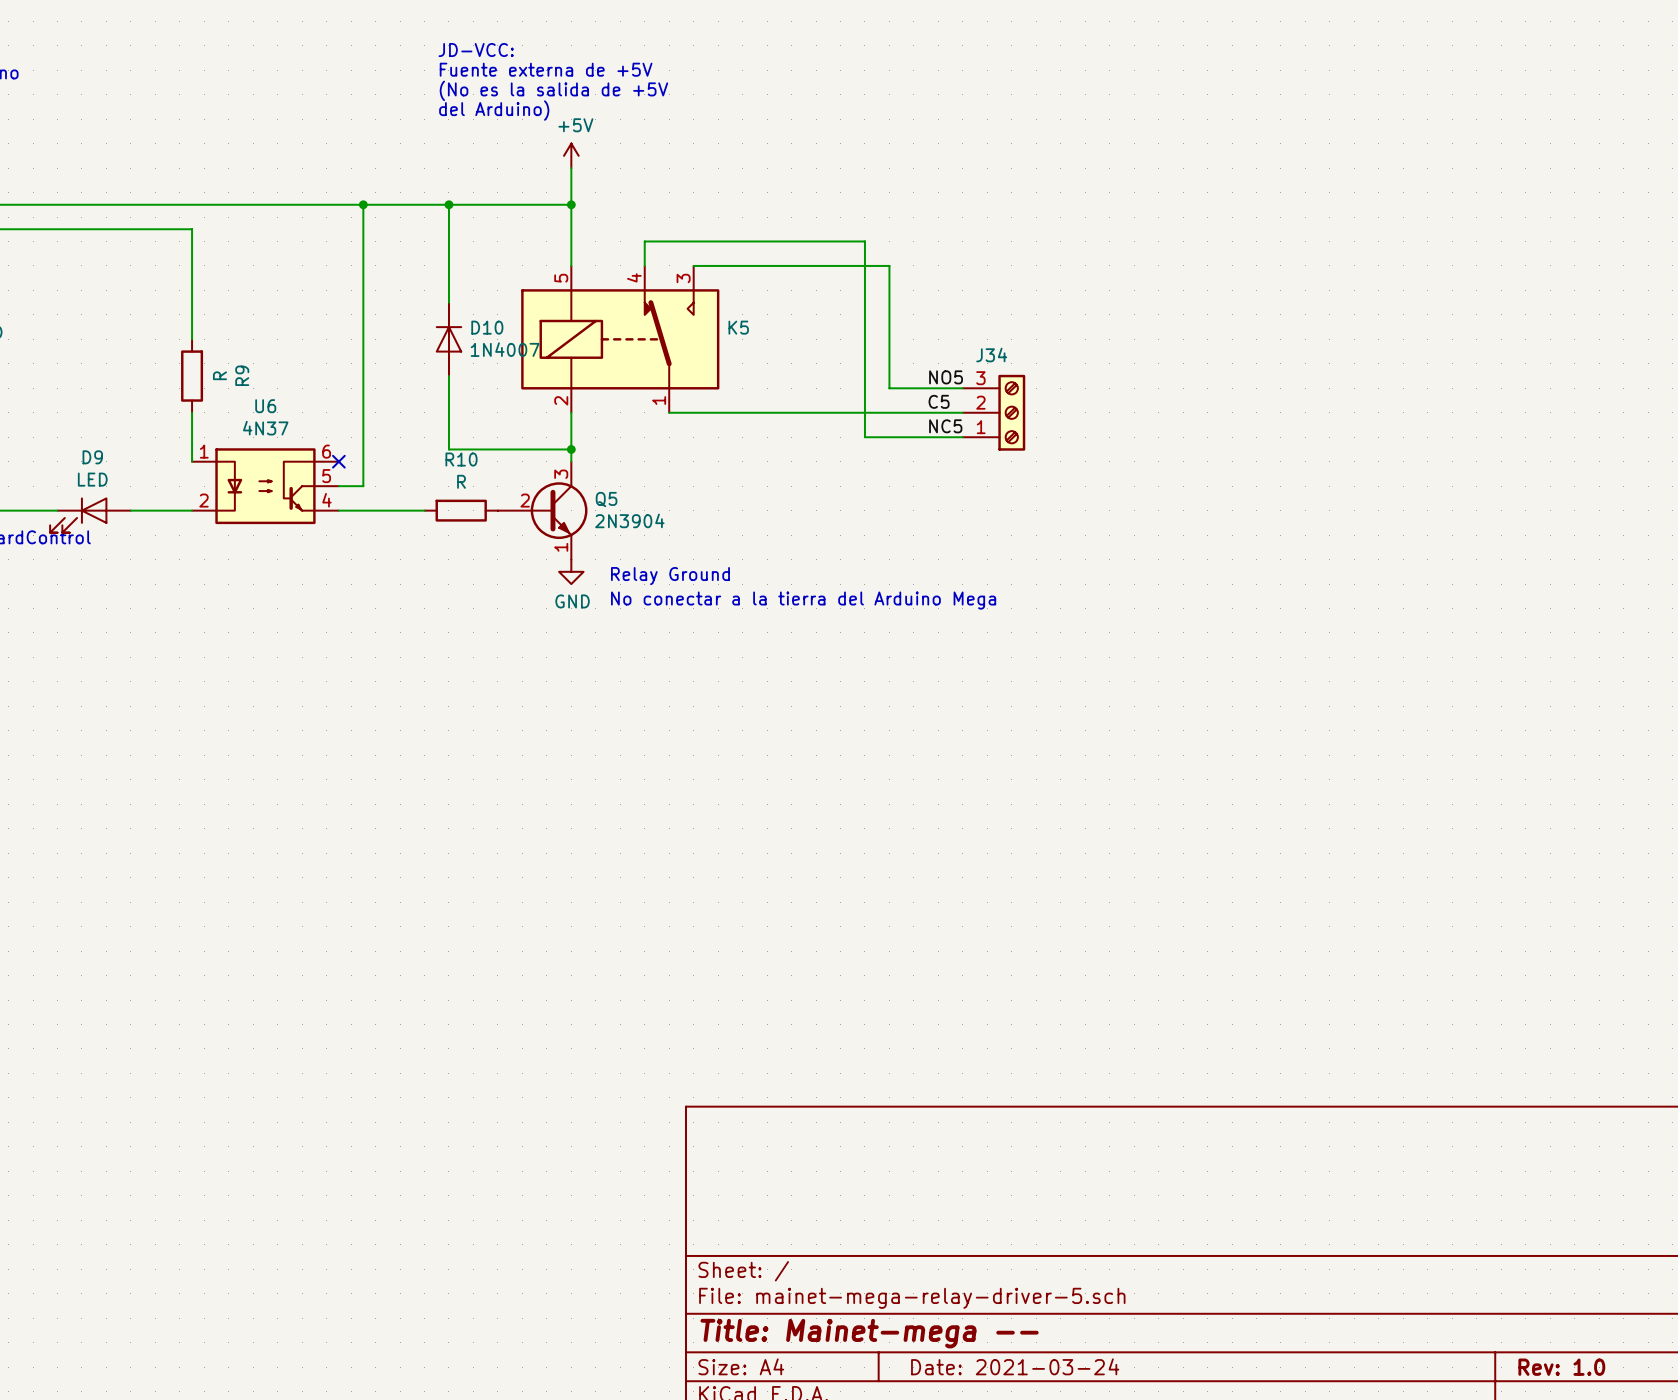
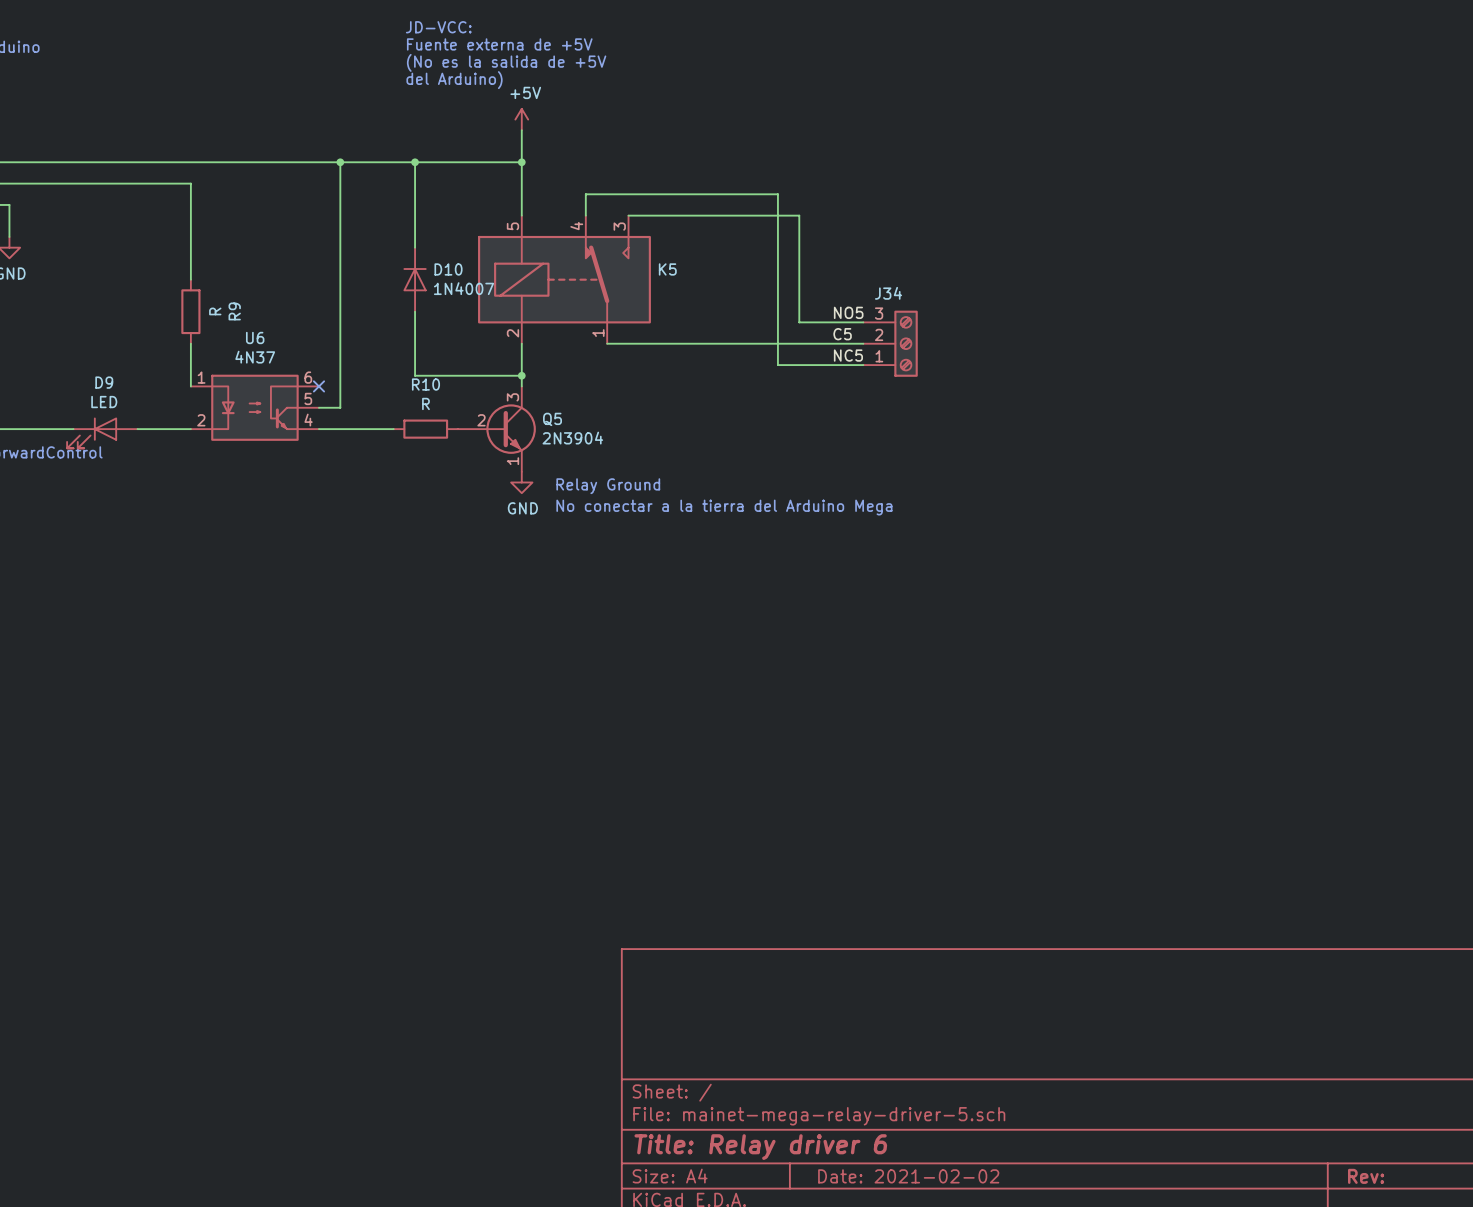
title block: Title: Mainet-mega -- (869, 1333) -> Title: Relay driver 6 (760, 1147)
title block: Date: 2021-03-24 (1015, 1366) -> Date: 2021-02-02 (908, 1176)
title block: Rev: 1.0 (1561, 1367) -> Rev: (1366, 1176)

